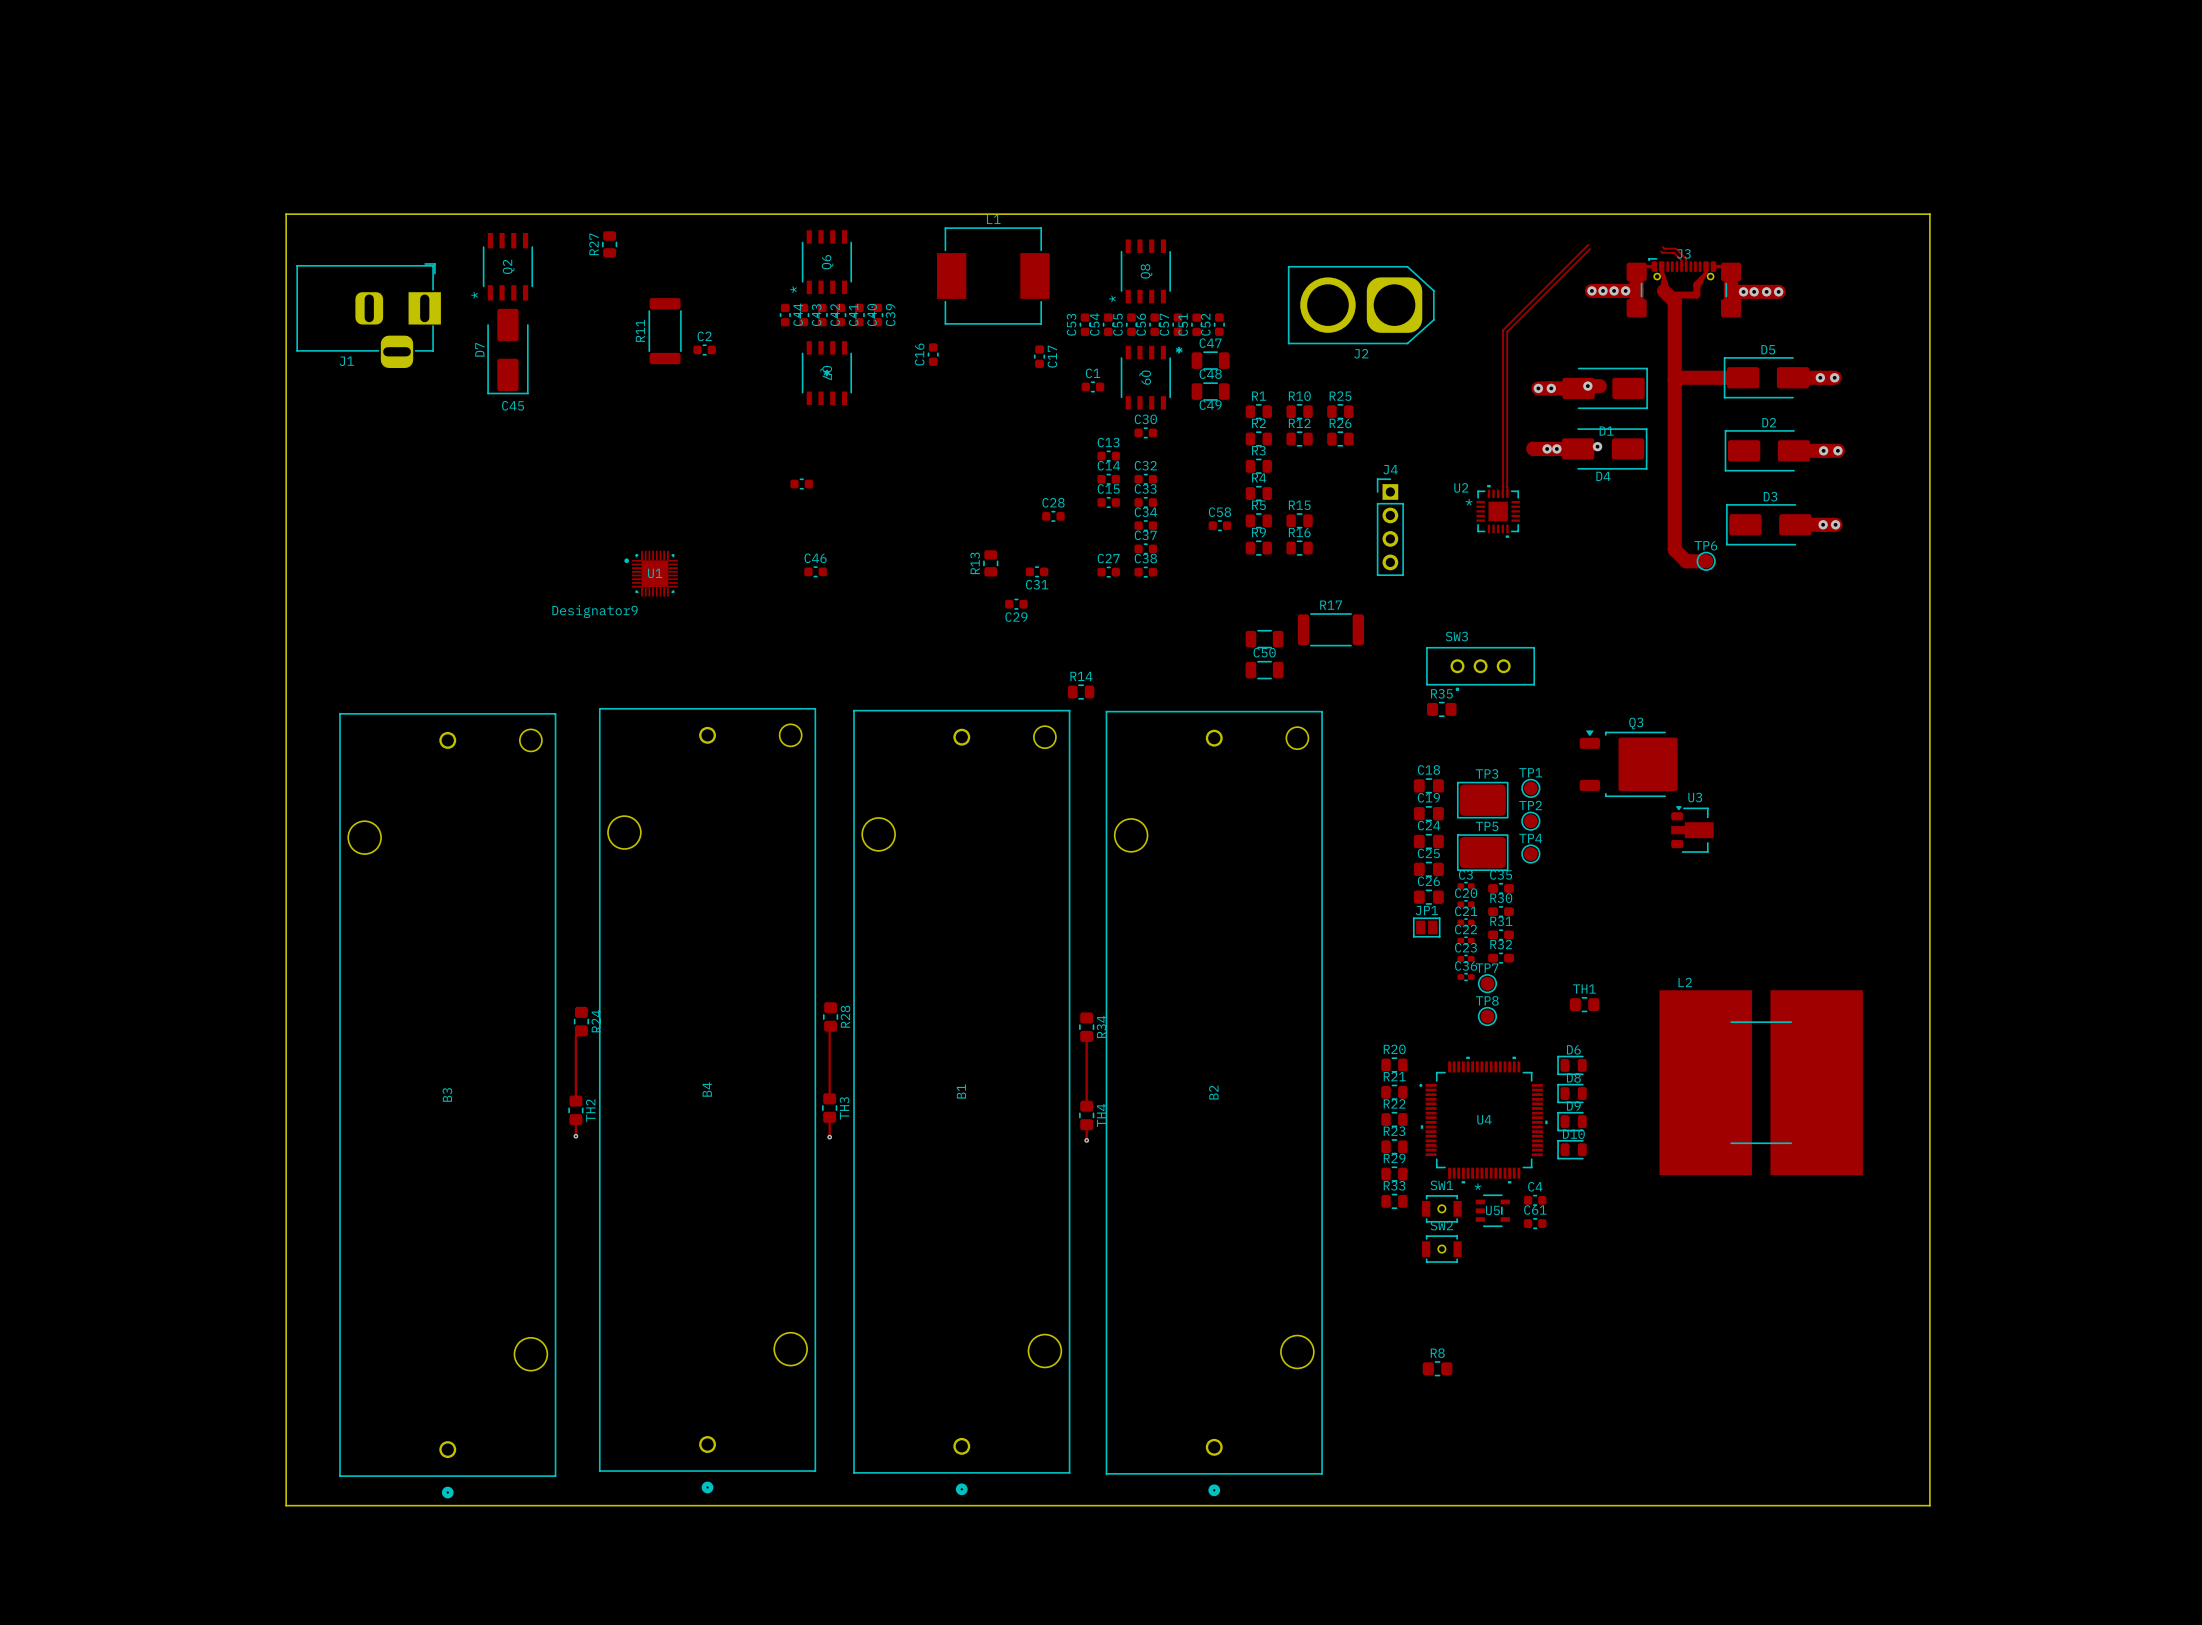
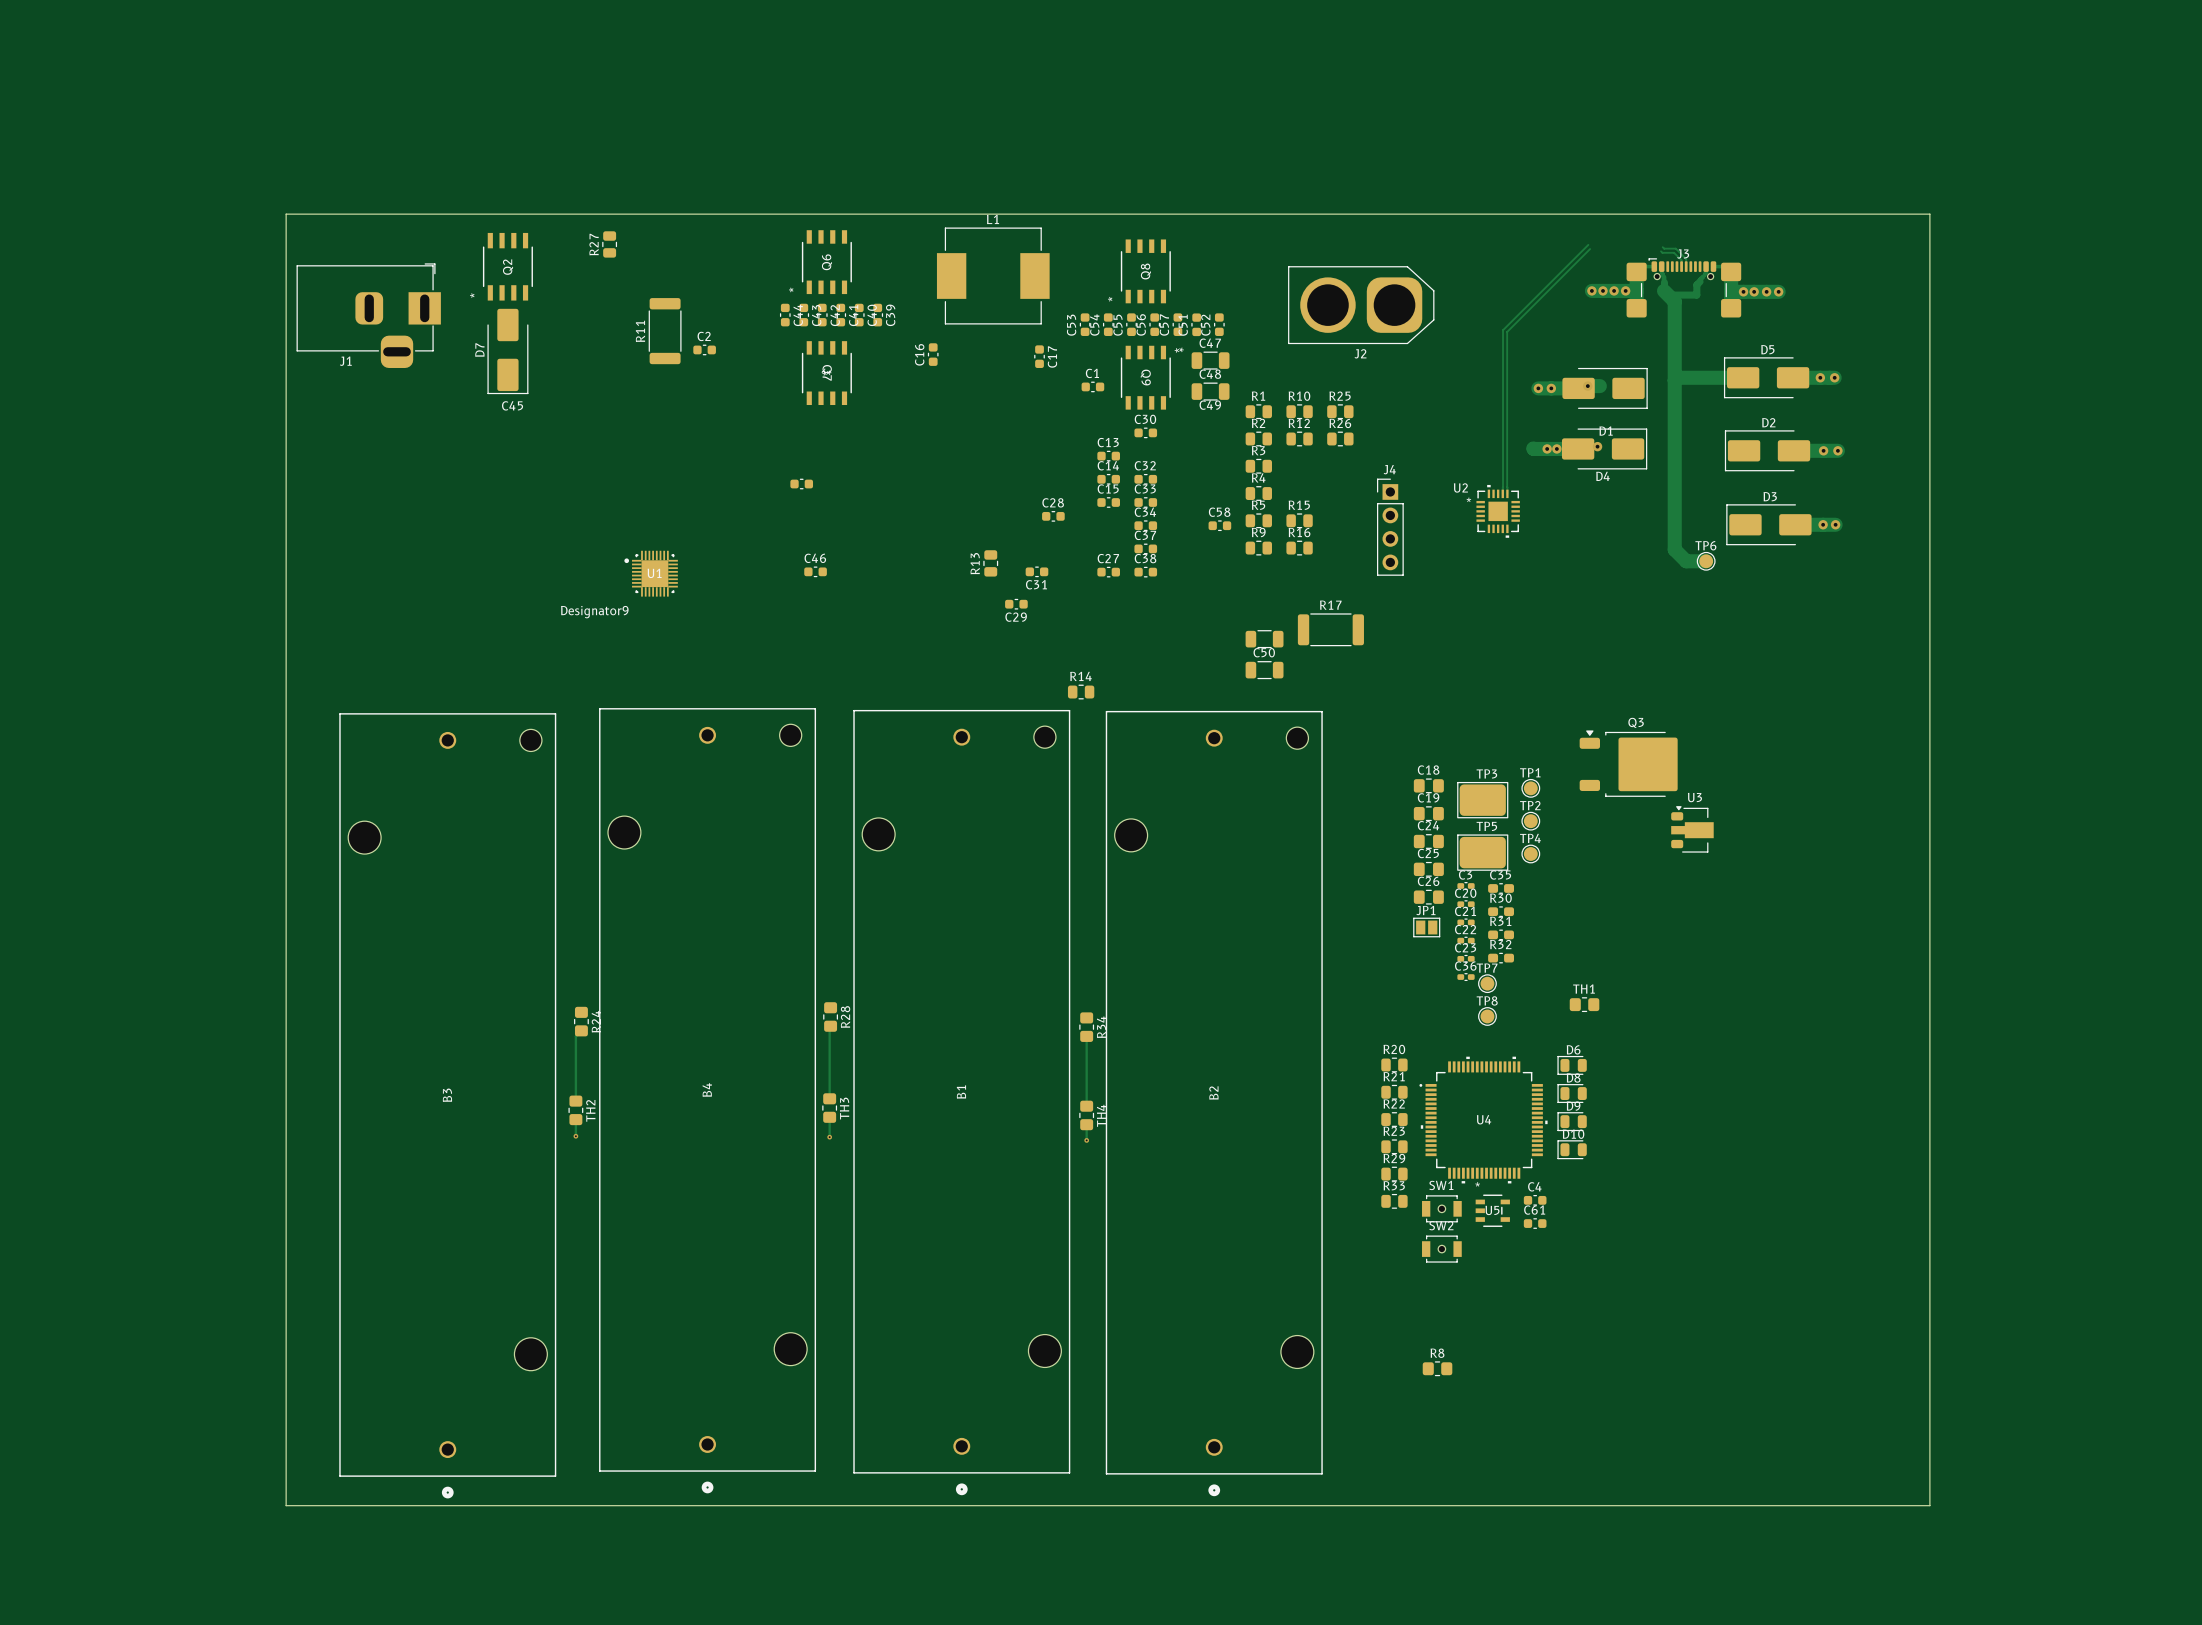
SW3: (1480, 669) -> none
R35: (1441, 709) -> none
L2: (1761, 1082) -> none

